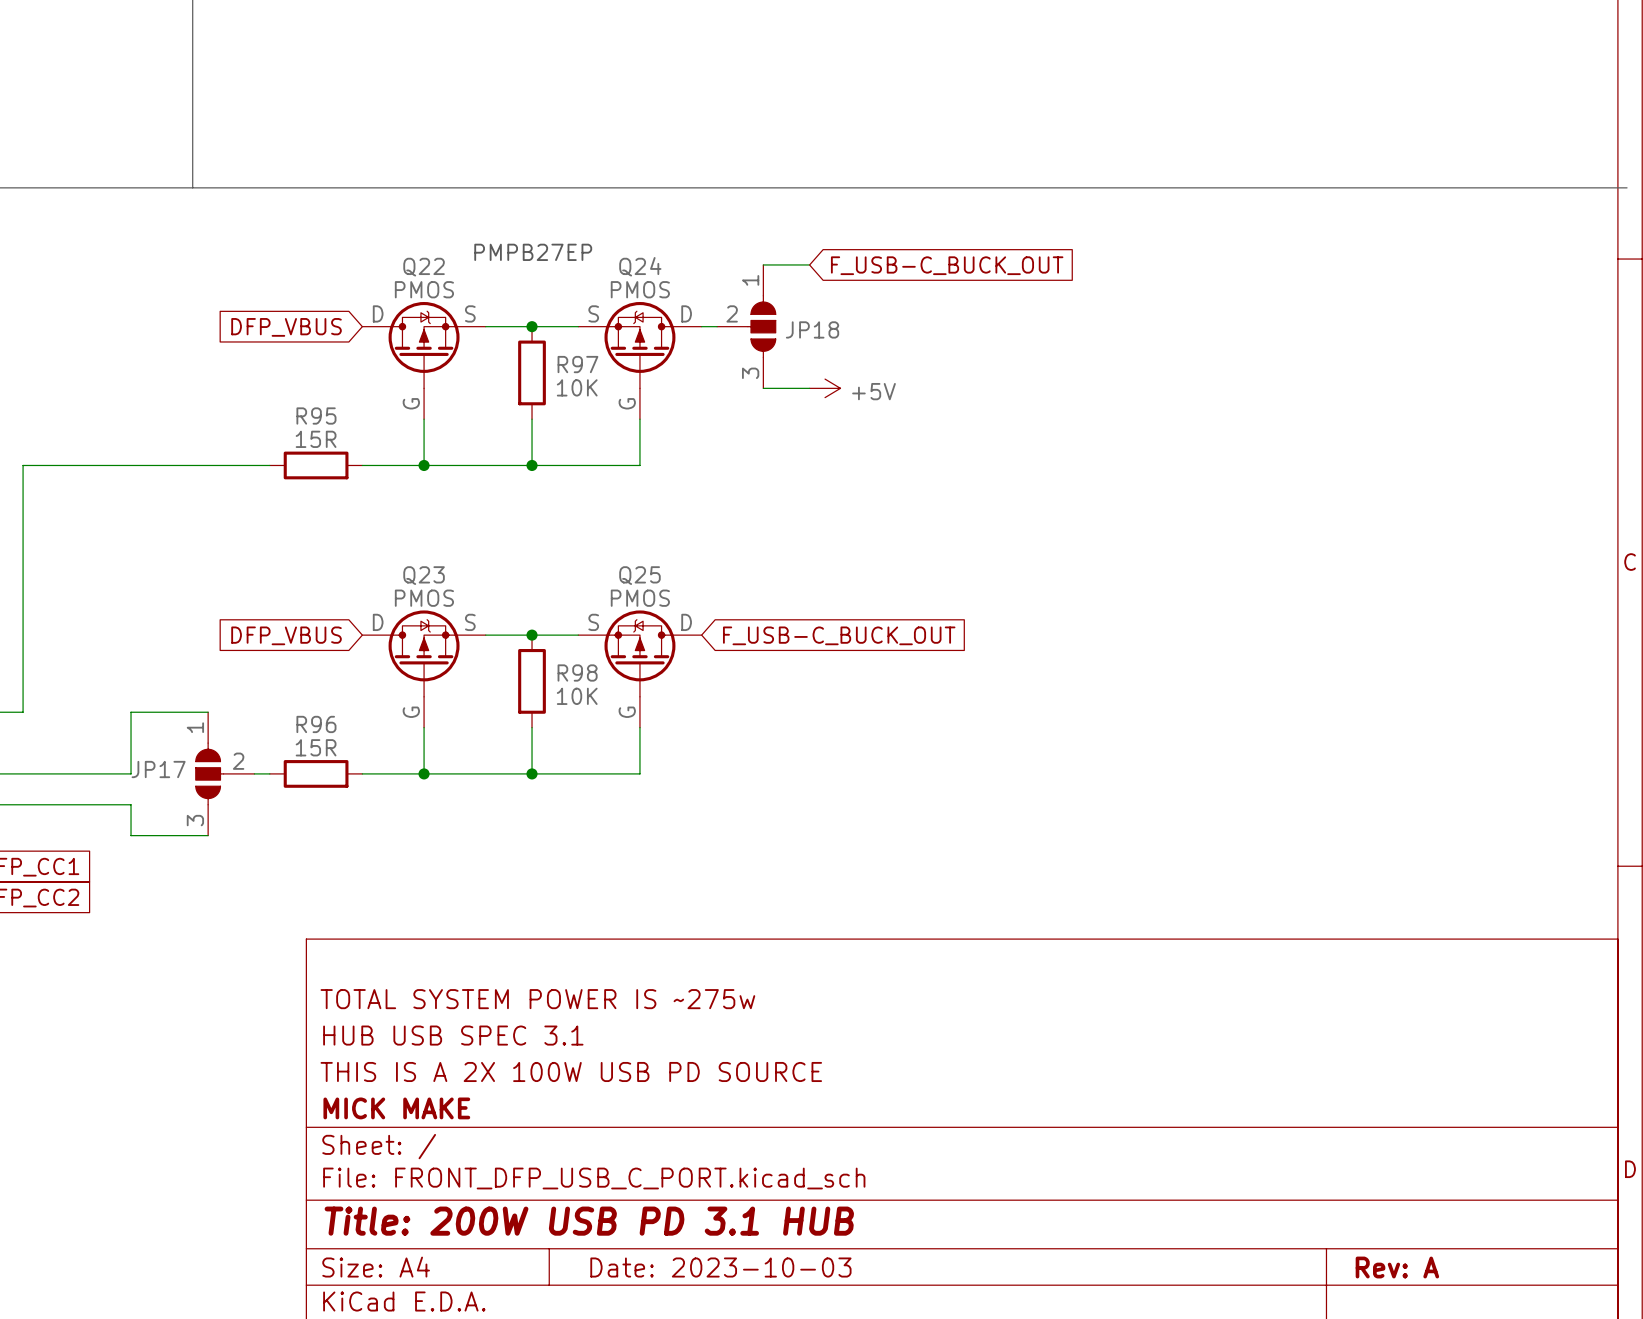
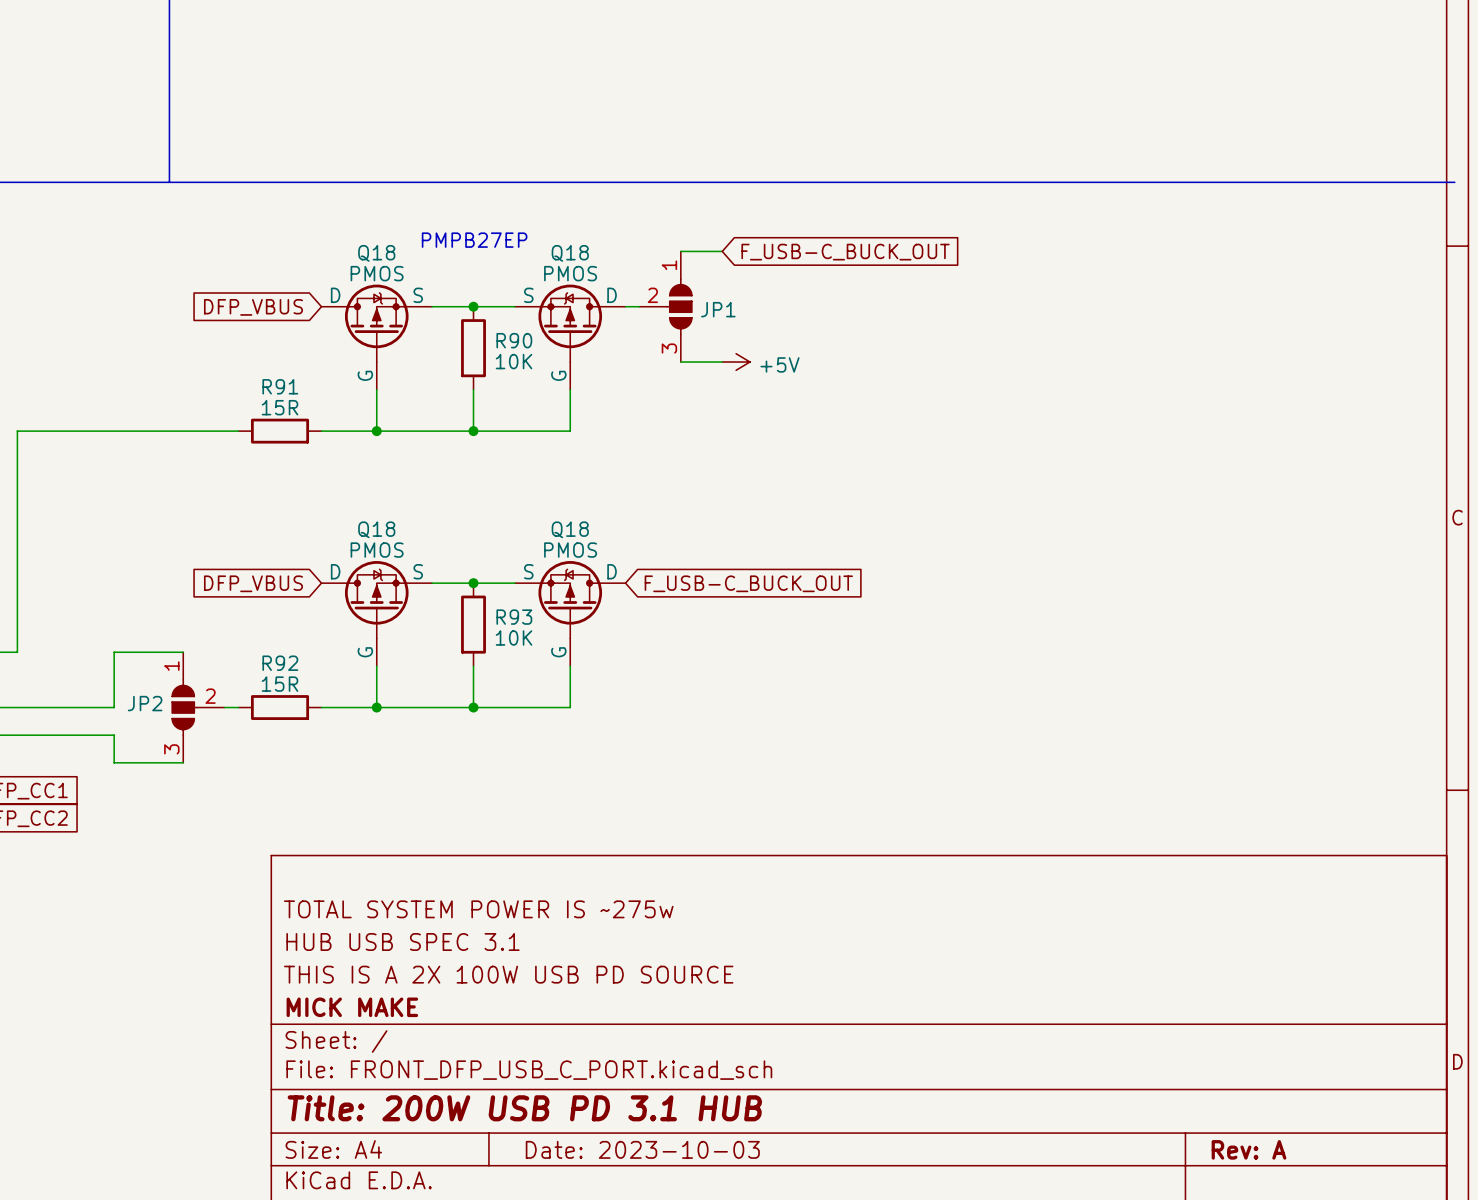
Q24 name: Q24 (640, 266) -> Q18 (570, 253)
Q22 name: Q22 (424, 267) -> Q18 (376, 253)
JP18 name: JP18 (812, 329) -> JP1 (718, 309)
R97 name: R97 (577, 364) -> R90 (514, 340)
R95 name: R95 (316, 416) -> R91 (280, 386)
Q23 name: Q23 (424, 575) -> Q18 (376, 529)
Q25 name: Q25 (639, 575) -> Q18 (570, 529)
R98 name: R98 (577, 673) -> R93 (514, 617)
R96 name: R96 (316, 724) -> R92 (280, 663)
JP17 name: JP17 (158, 769) -> JP2 (145, 703)

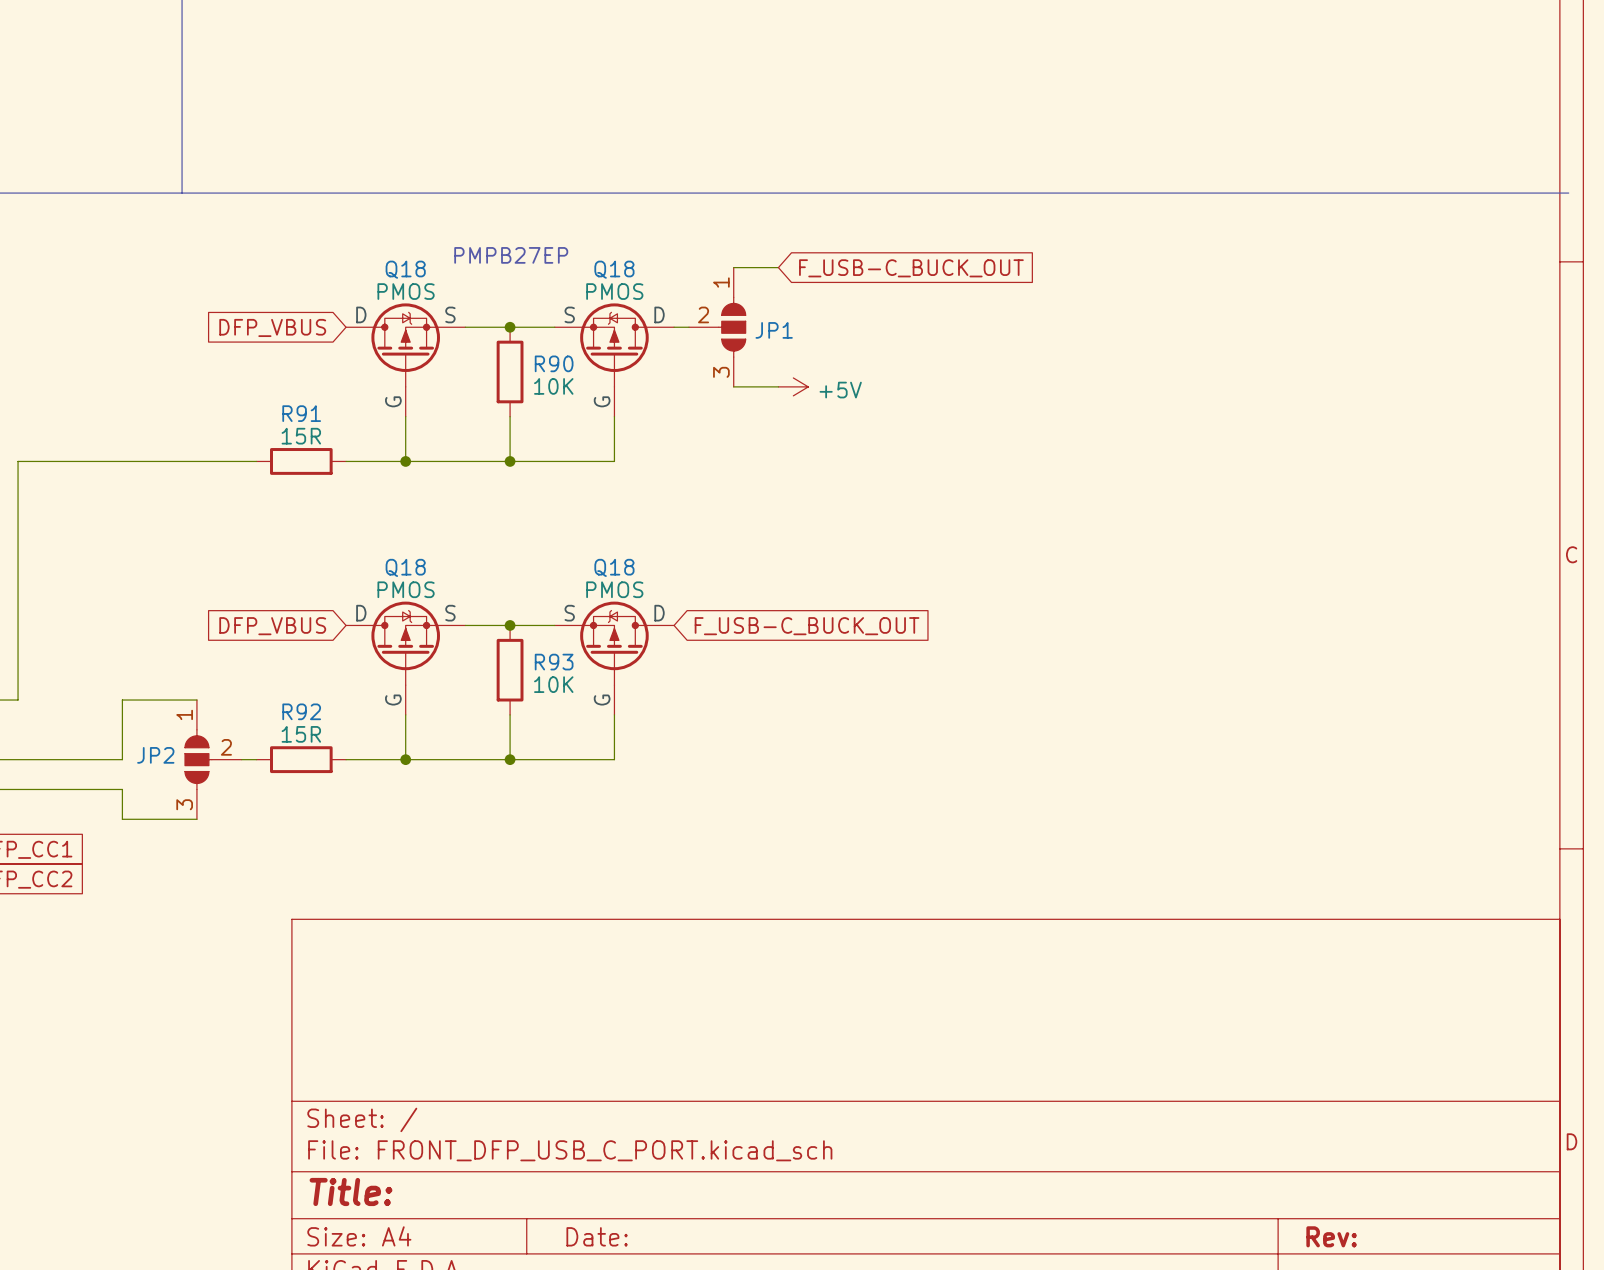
title block: TOTAL SYSTEM POWER IS ~275w (478, 909) -> none
title block: HUB USB SPEC 3.1 (402, 942) -> none
title block: THIS IS A 2X 100W USB PD SOURCE (508, 974) -> none
title block: MICK MAKE (352, 1007) -> none
title block: Title: 200W USB PD 3.1 HUB (524, 1108) -> Title: (350, 1191)
title block: Date: 2023-10-03 (642, 1149) -> Date: (597, 1236)
title block: Rev: A (1249, 1149) -> Rev: (1331, 1236)

